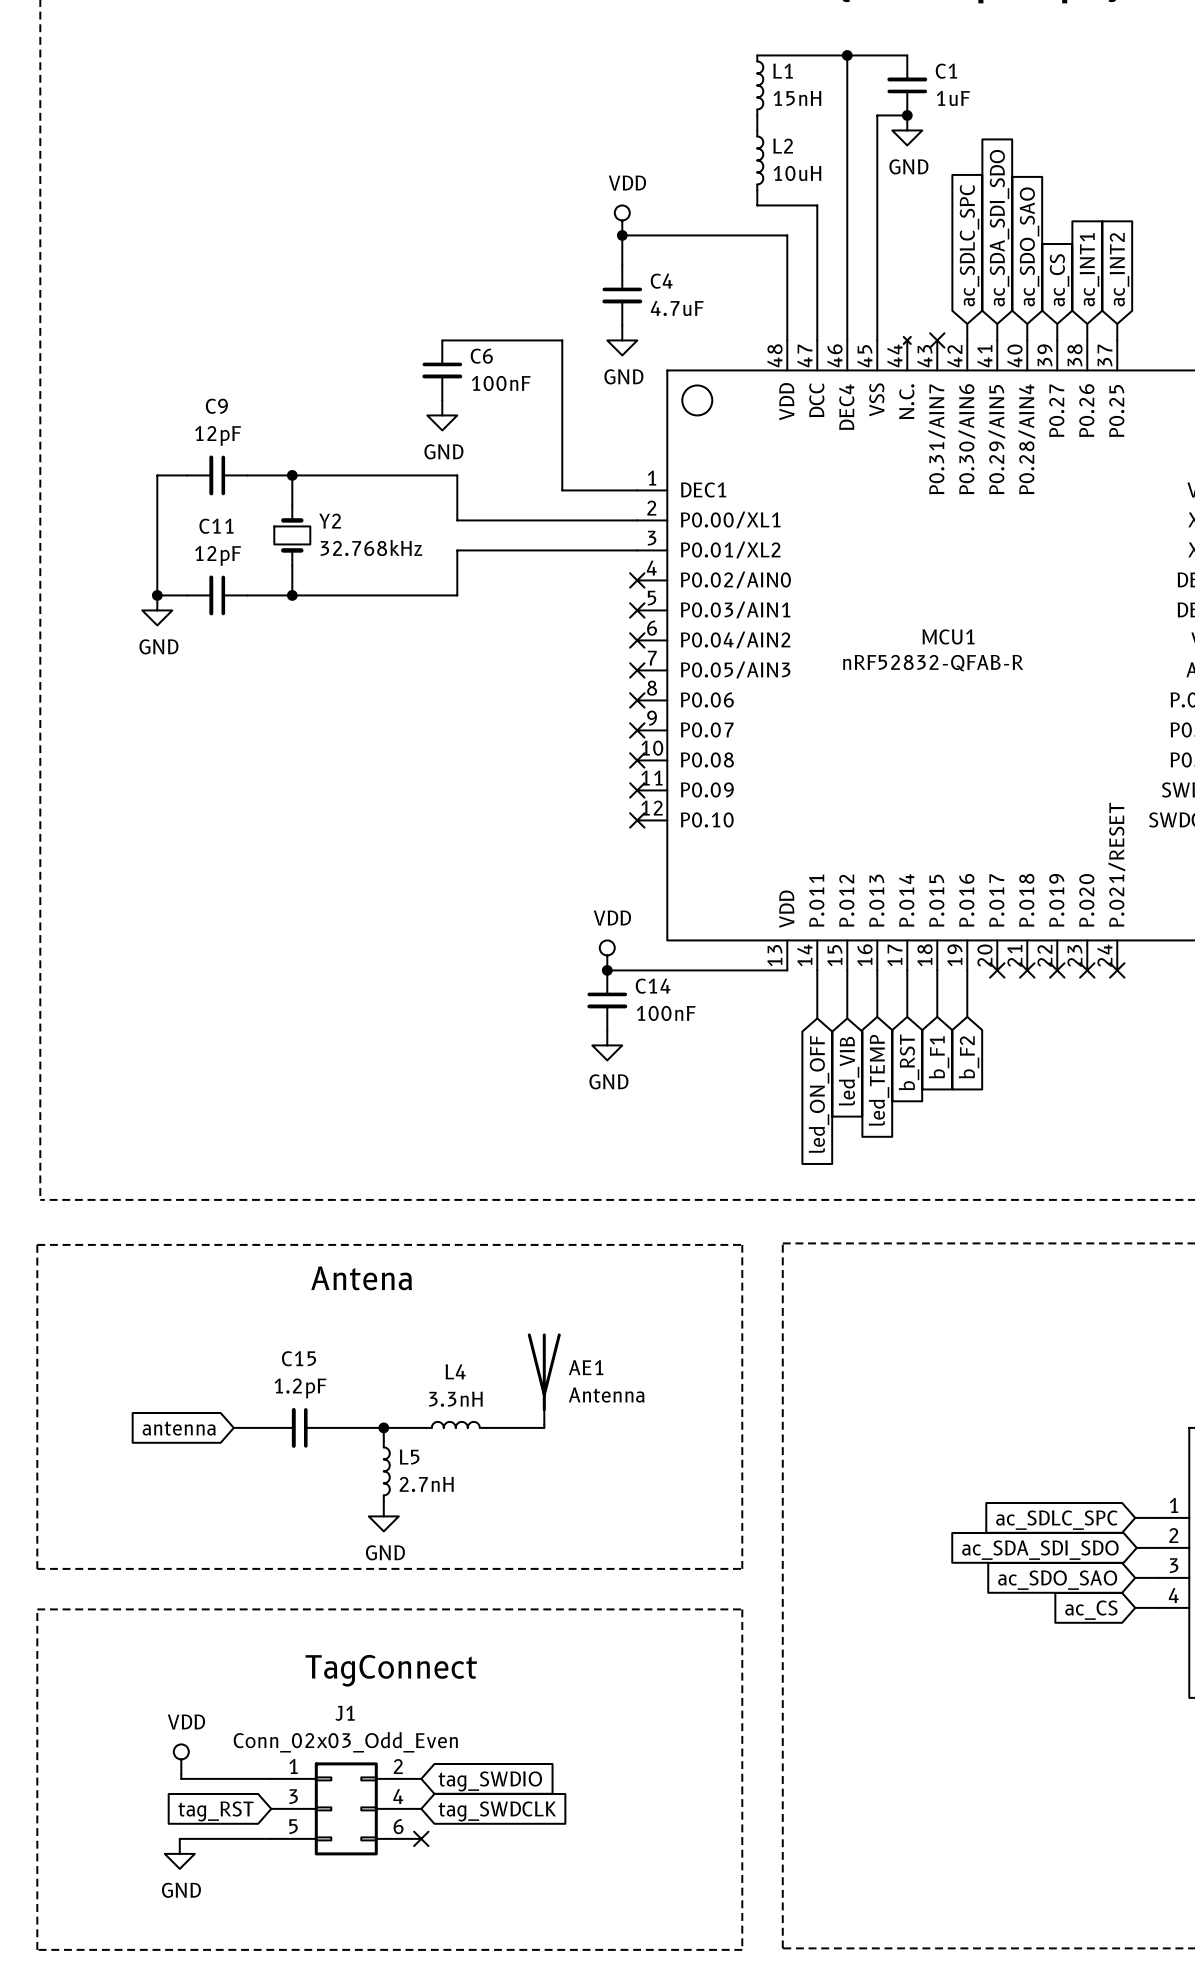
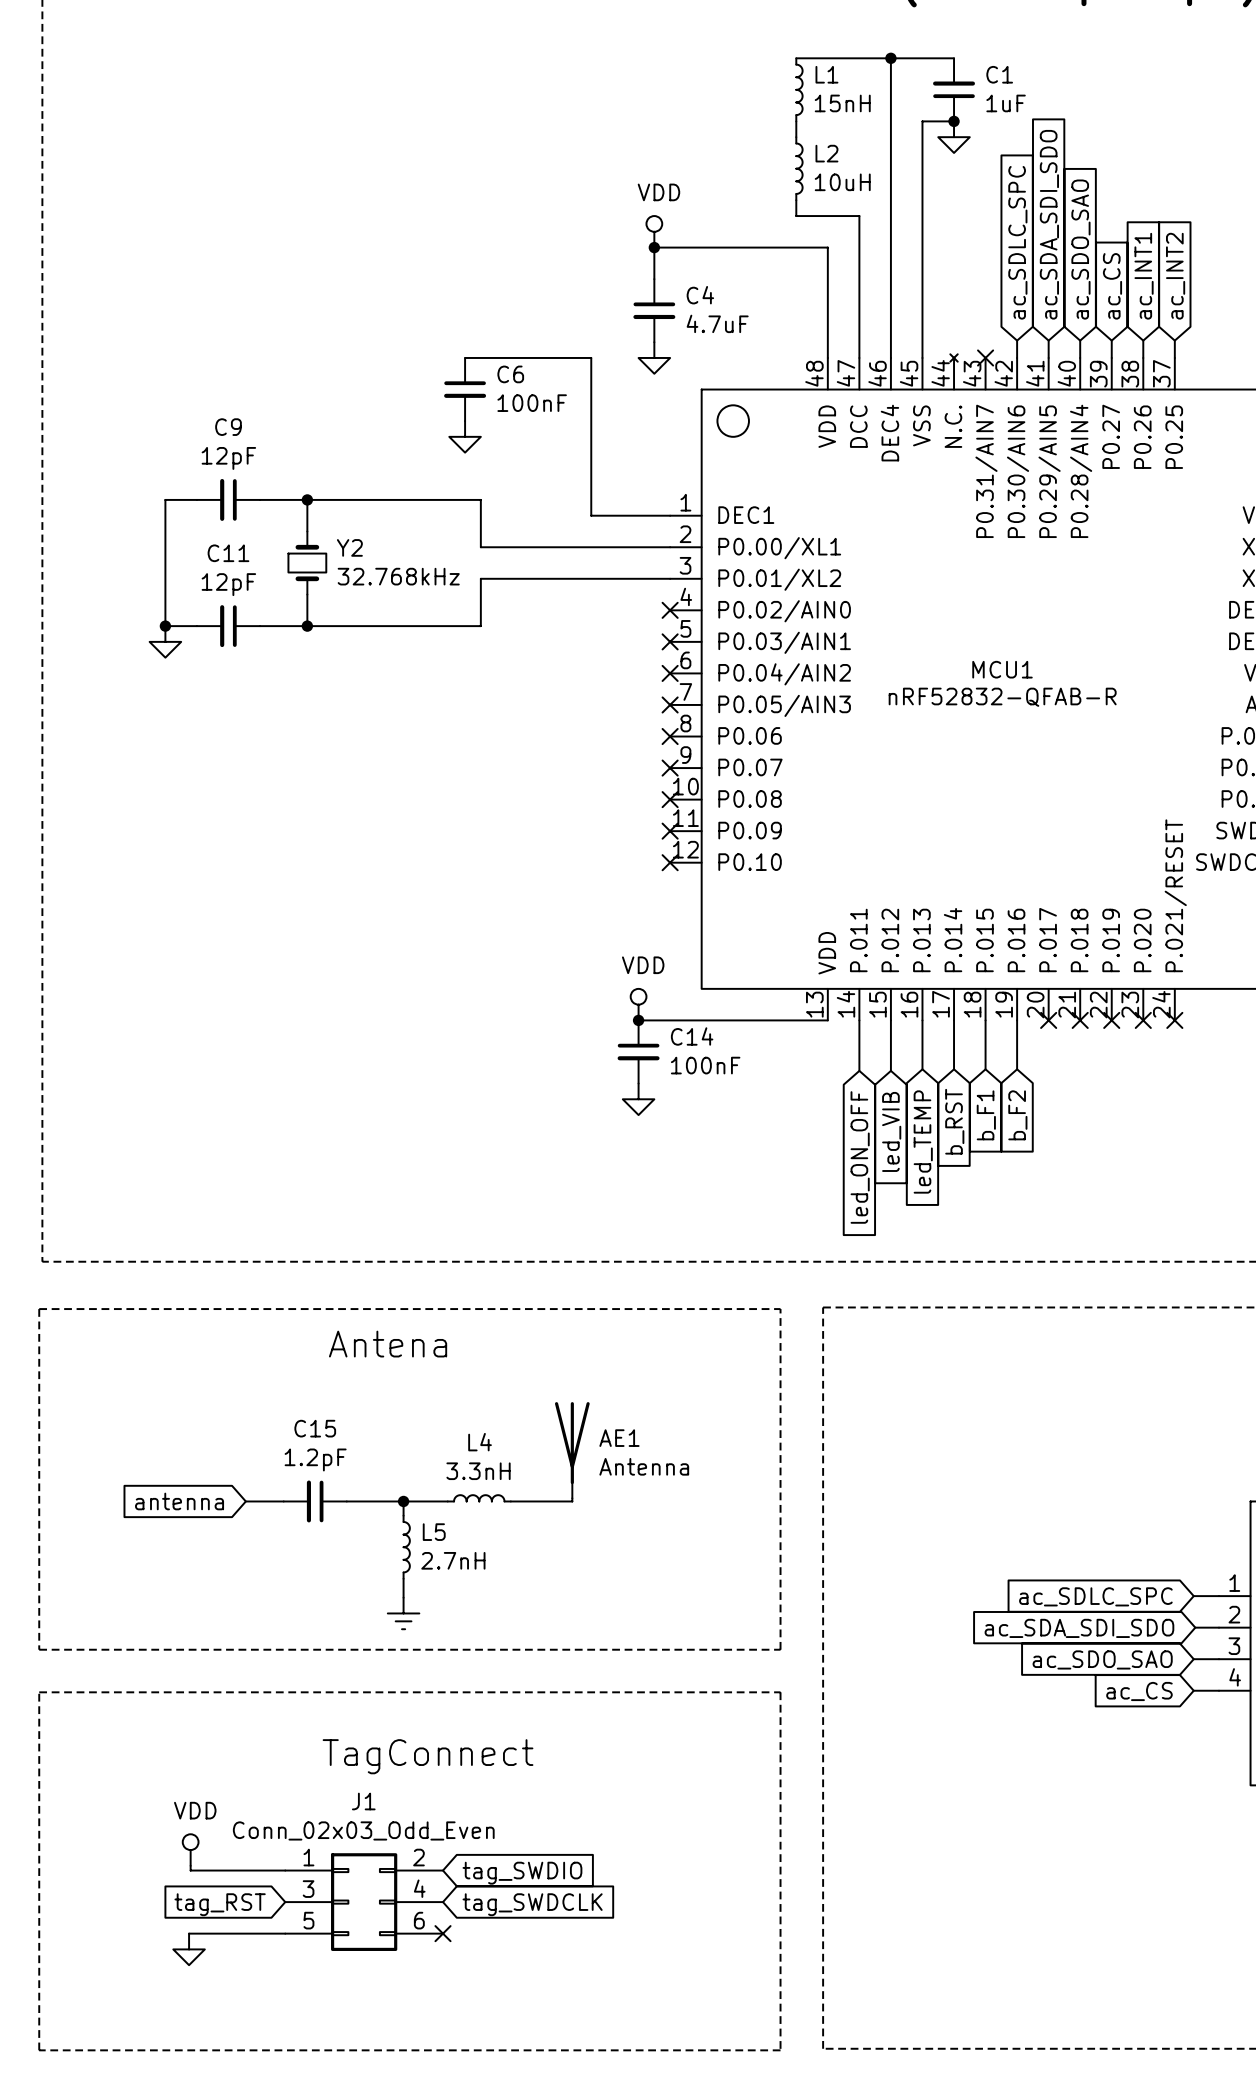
power symbol text: GND (908, 166) -> none
power symbol text: GND (623, 376) -> none
power symbol text: GND (443, 451) -> none
power symbol text: GND (158, 646) -> none
power symbol text: GND (608, 1081) -> none
power symbol: GND (383, 1516) -> none
power symbol: none -> (403, 1613)
power symbol text: GND (181, 1890) -> none

